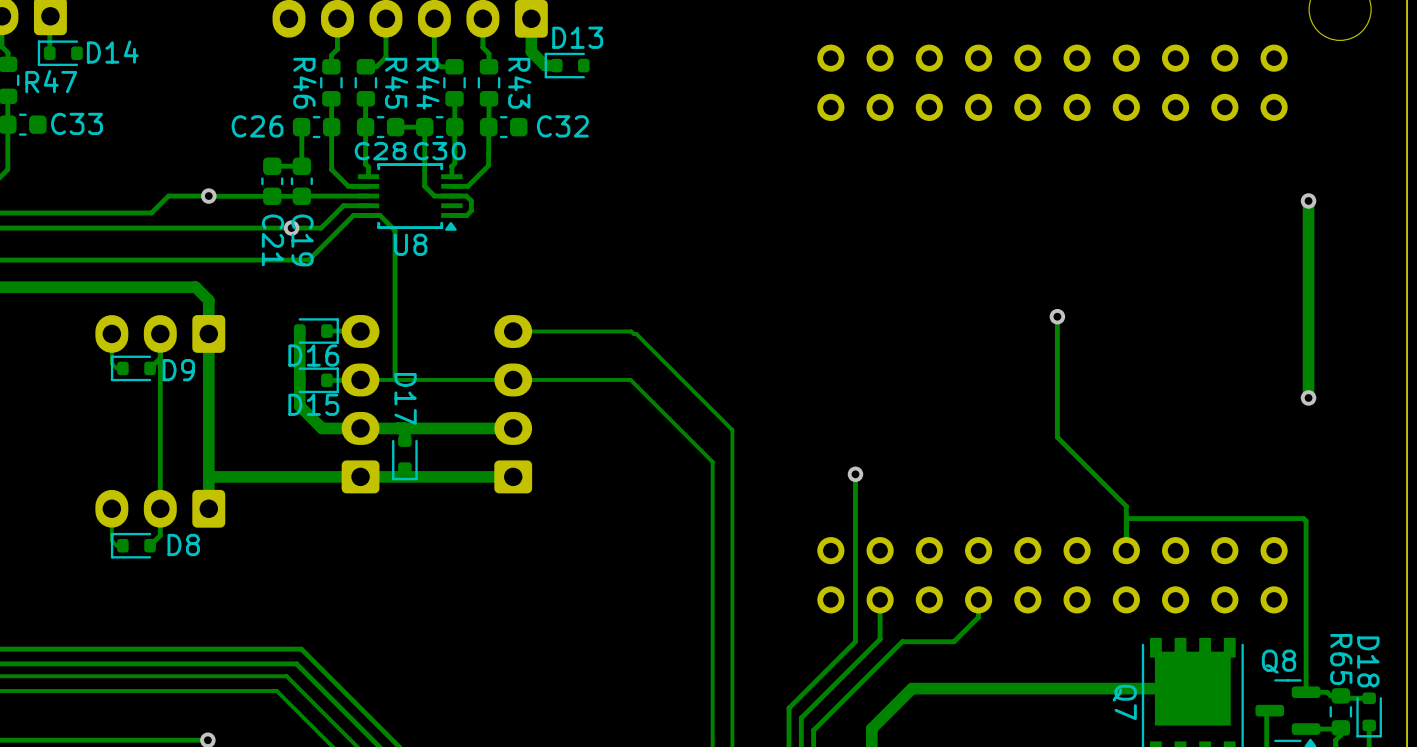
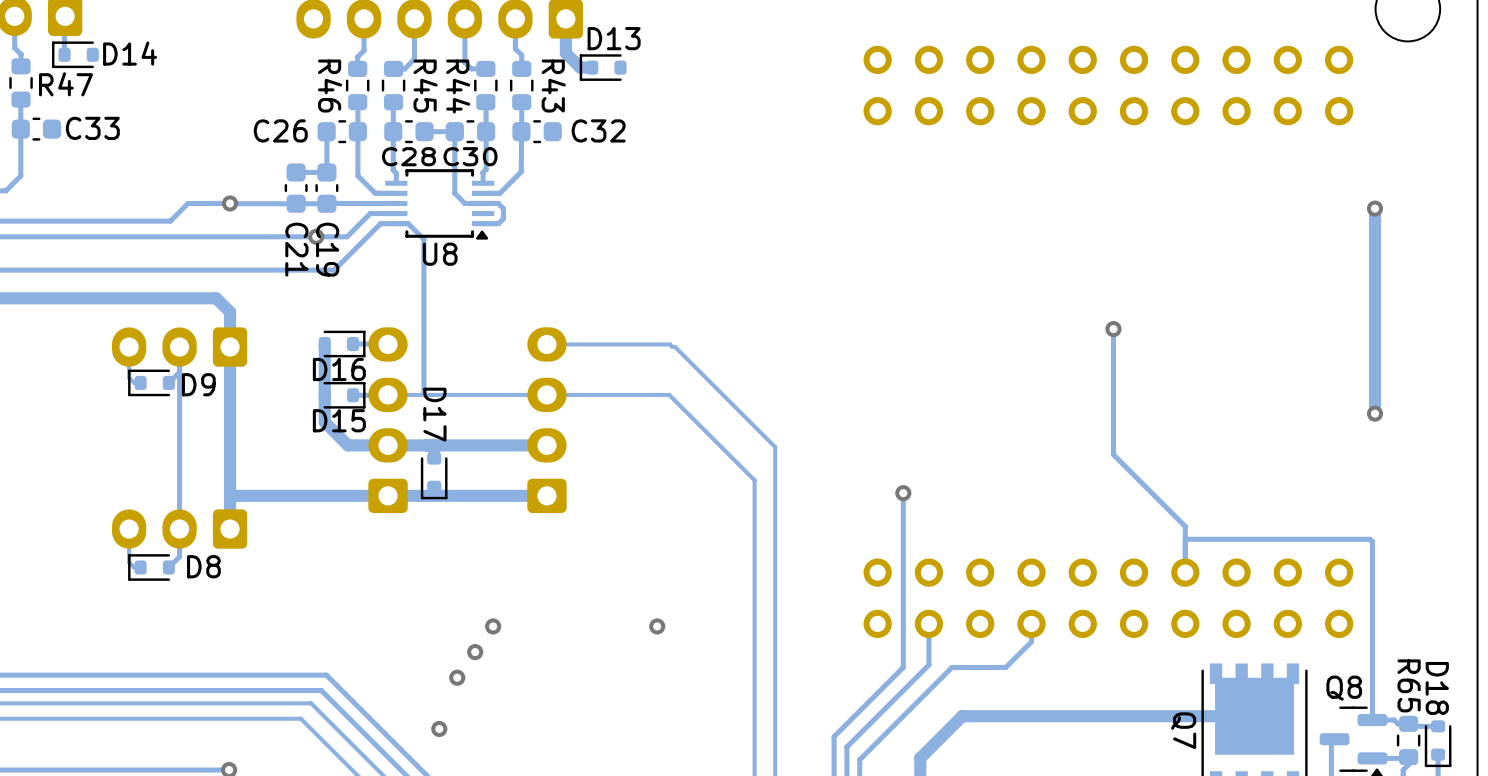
via: none -> (493, 626)
via: none -> (657, 626)
via: none -> (475, 652)
via: none -> (457, 677)
via: none -> (439, 728)

